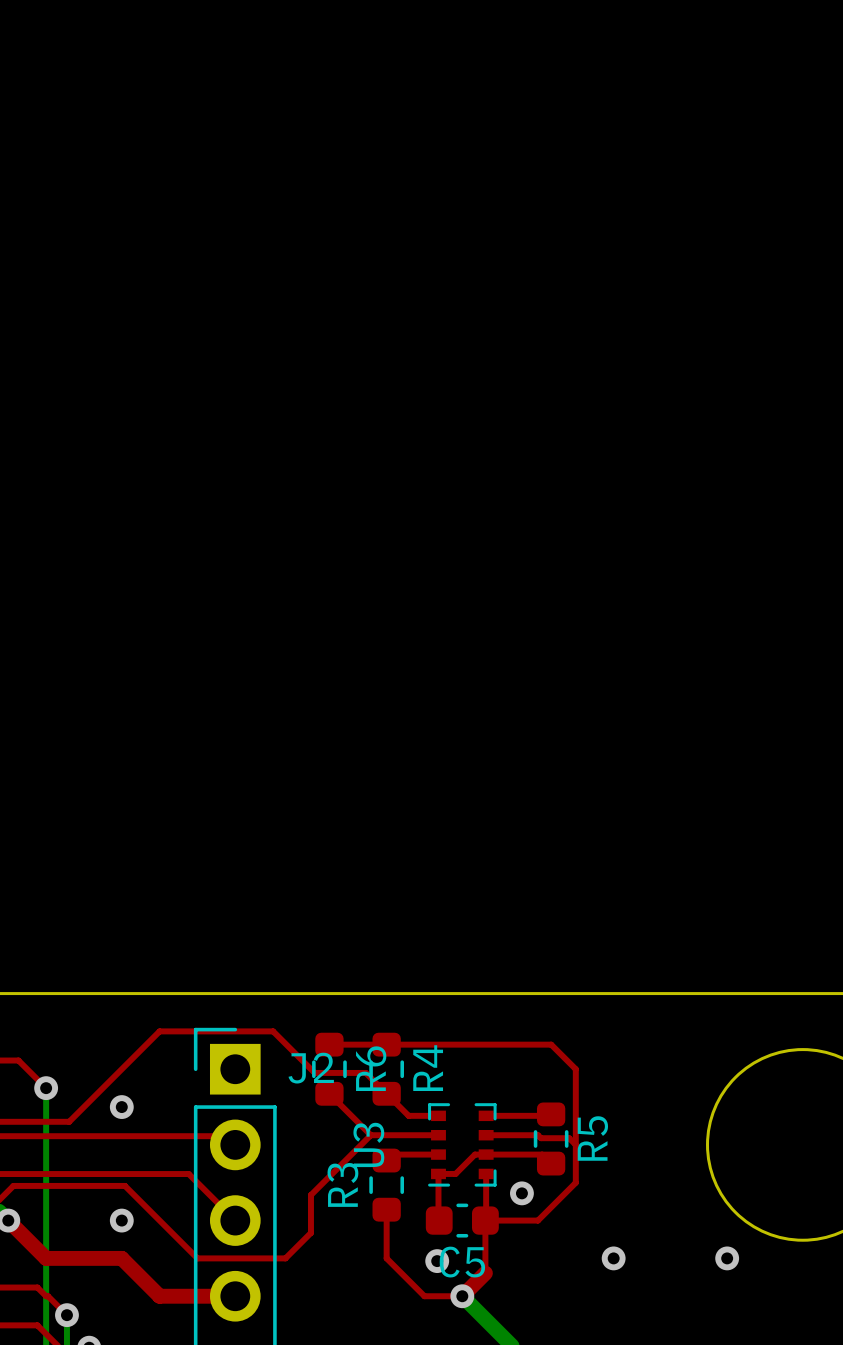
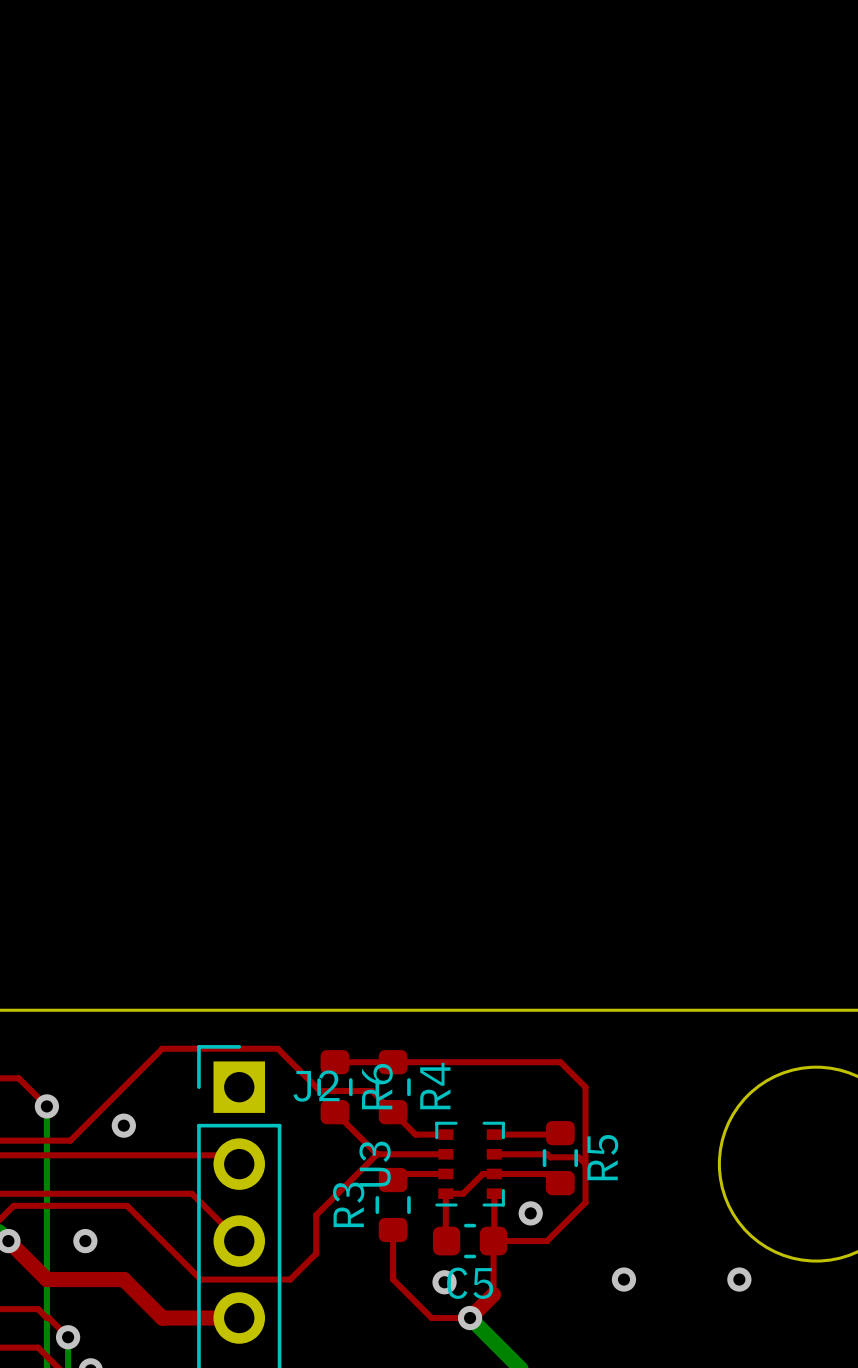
via position: (121, 1220) -> (85, 1241)

